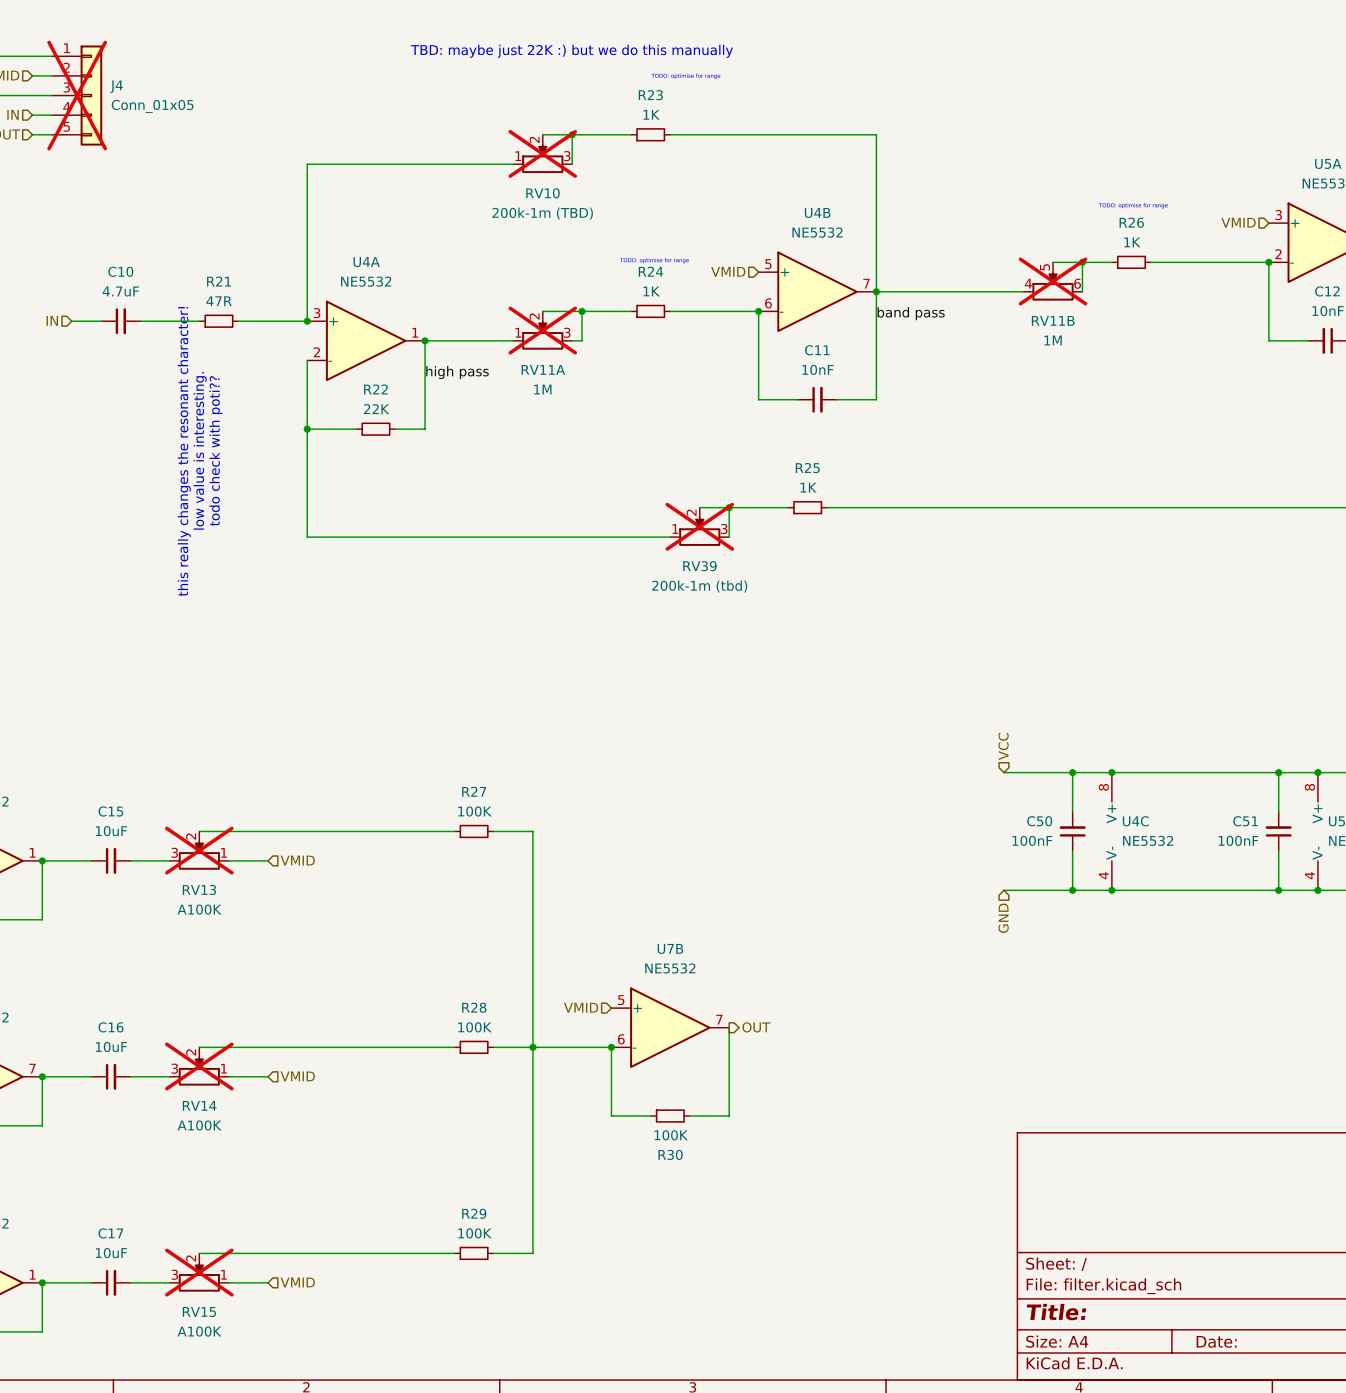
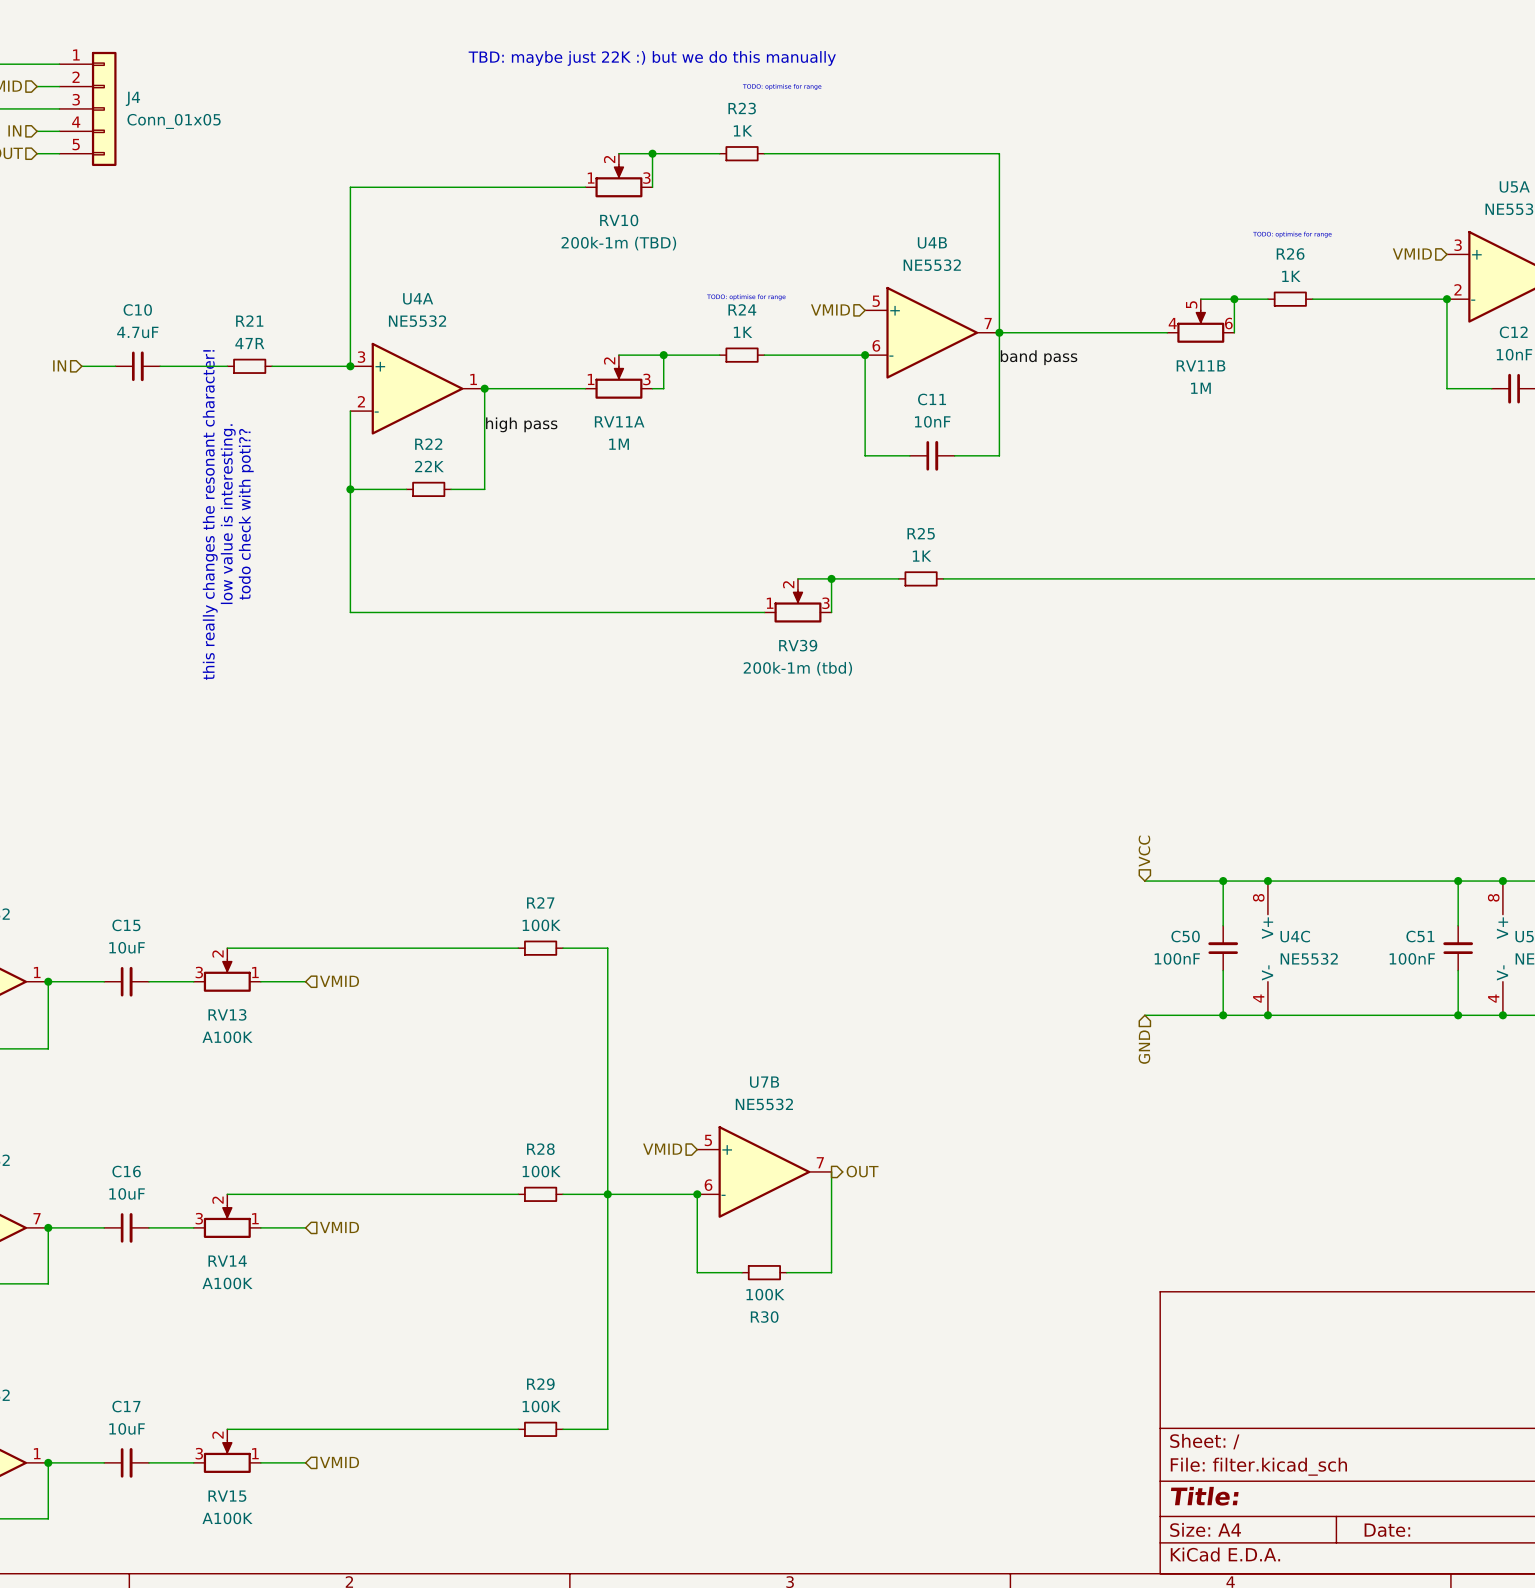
J4 do-not-place cross: (77, 95) -> none
RV10 do-not-place cross: (542, 153) -> none
RV11B do-not-place cross: (1053, 281) -> none
RV11A do-not-place cross: (542, 330) -> none
RV39 do-not-place cross: (699, 526) -> none
RV13 do-not-place cross: (199, 850) -> none
RV14 do-not-place cross: (199, 1066) -> none
RV15 do-not-place cross: (199, 1272) -> none

